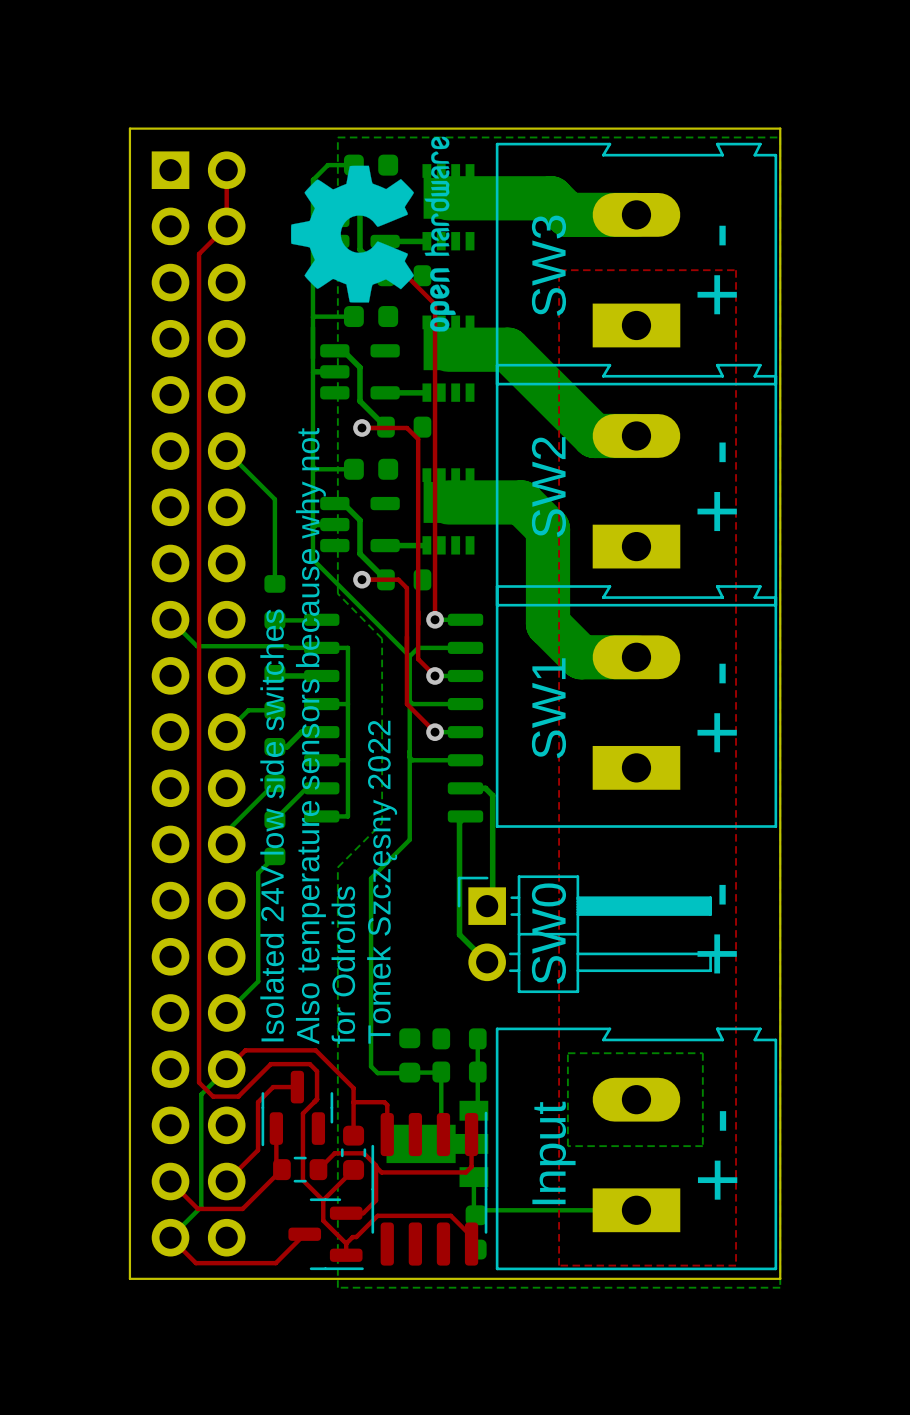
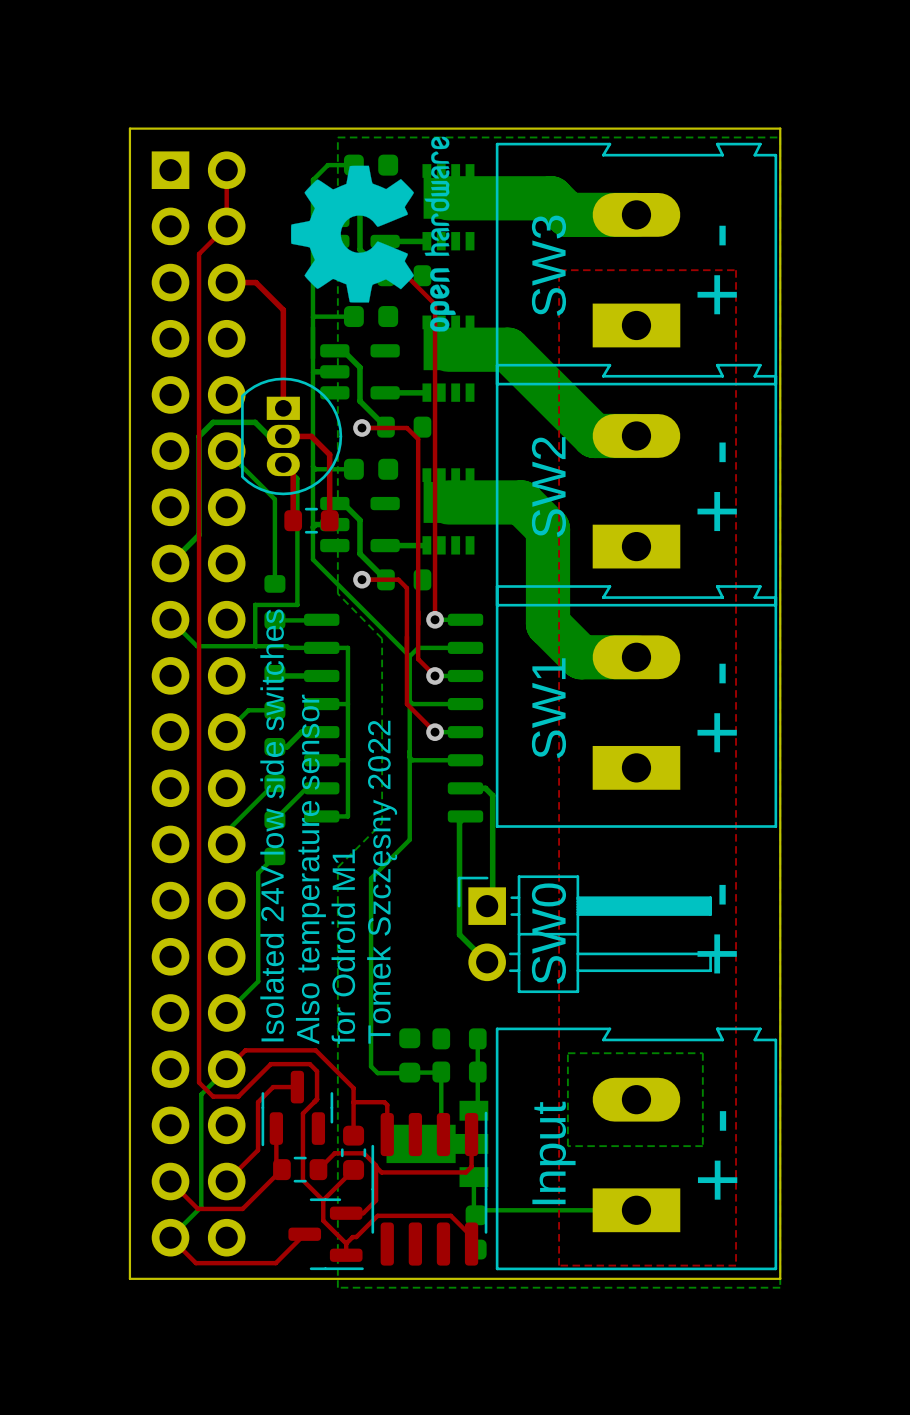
top track: none -> (226, 282) (255, 282) (283, 310) (283, 408)
top track: none -> (287, 432) (283, 436) (311, 436) (329, 454) (329, 520)
bottom track: none -> (283, 436) (269, 436) (255, 422) (213, 422) (199, 436) (199, 534) (170, 563)
part: none -> (291, 436)
bottom track: none -> (283, 464) (297, 478) (297, 604)
top track: none -> (283, 464) (293, 474) (293, 520)
part: none -> (311, 520)
bottom track: none -> (255, 604) (297, 604)
bottom track: none -> (255, 604) (256, 646)
text: Also temperature sensors because why not (310, 736) -> Also temperature sensor (310, 869)
text: for Odroids (343, 965) -> for Odroid M1 (343, 946)

